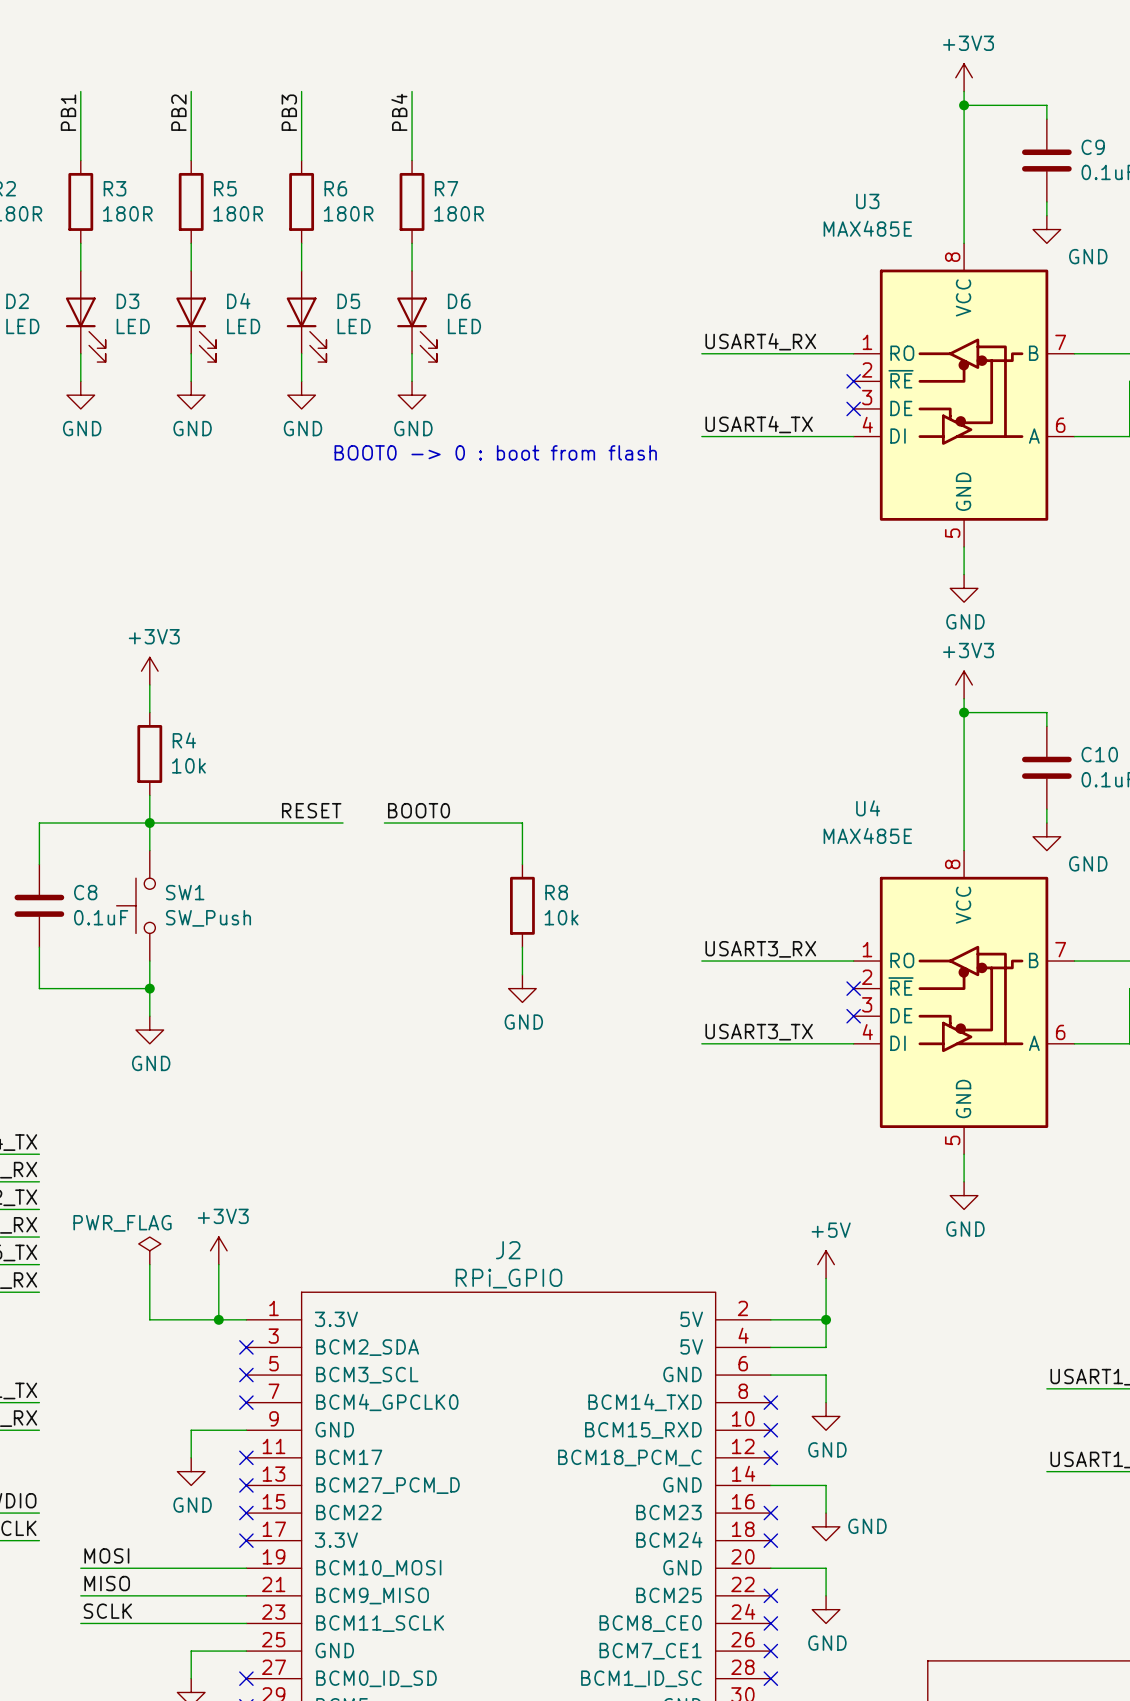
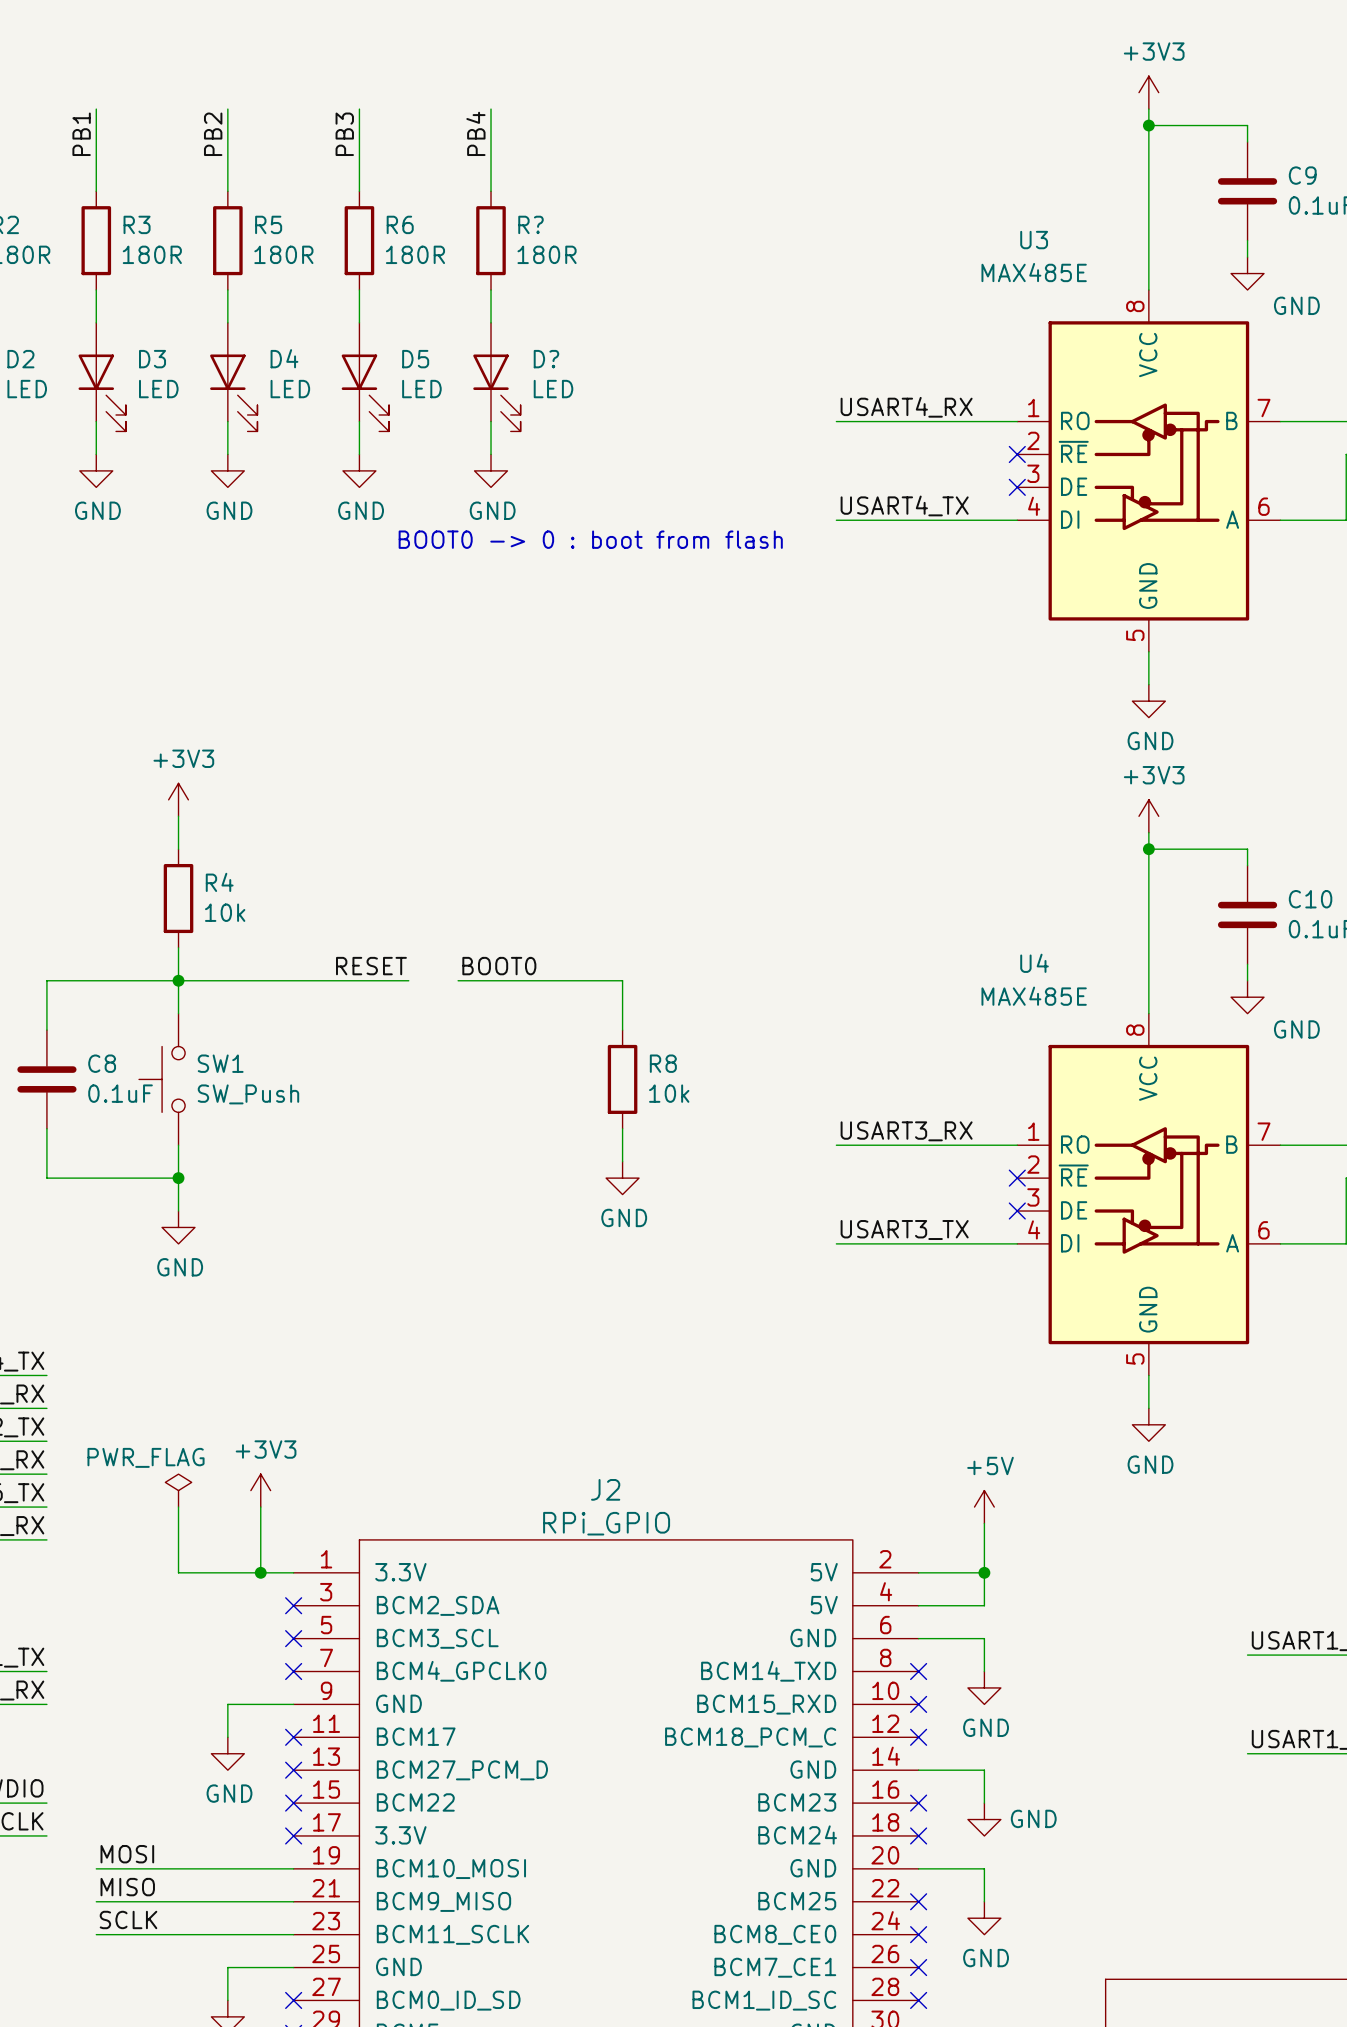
R7 name: R7 (446, 188) -> R? (530, 224)
D6 name: D6 (459, 301) -> D? (546, 359)

